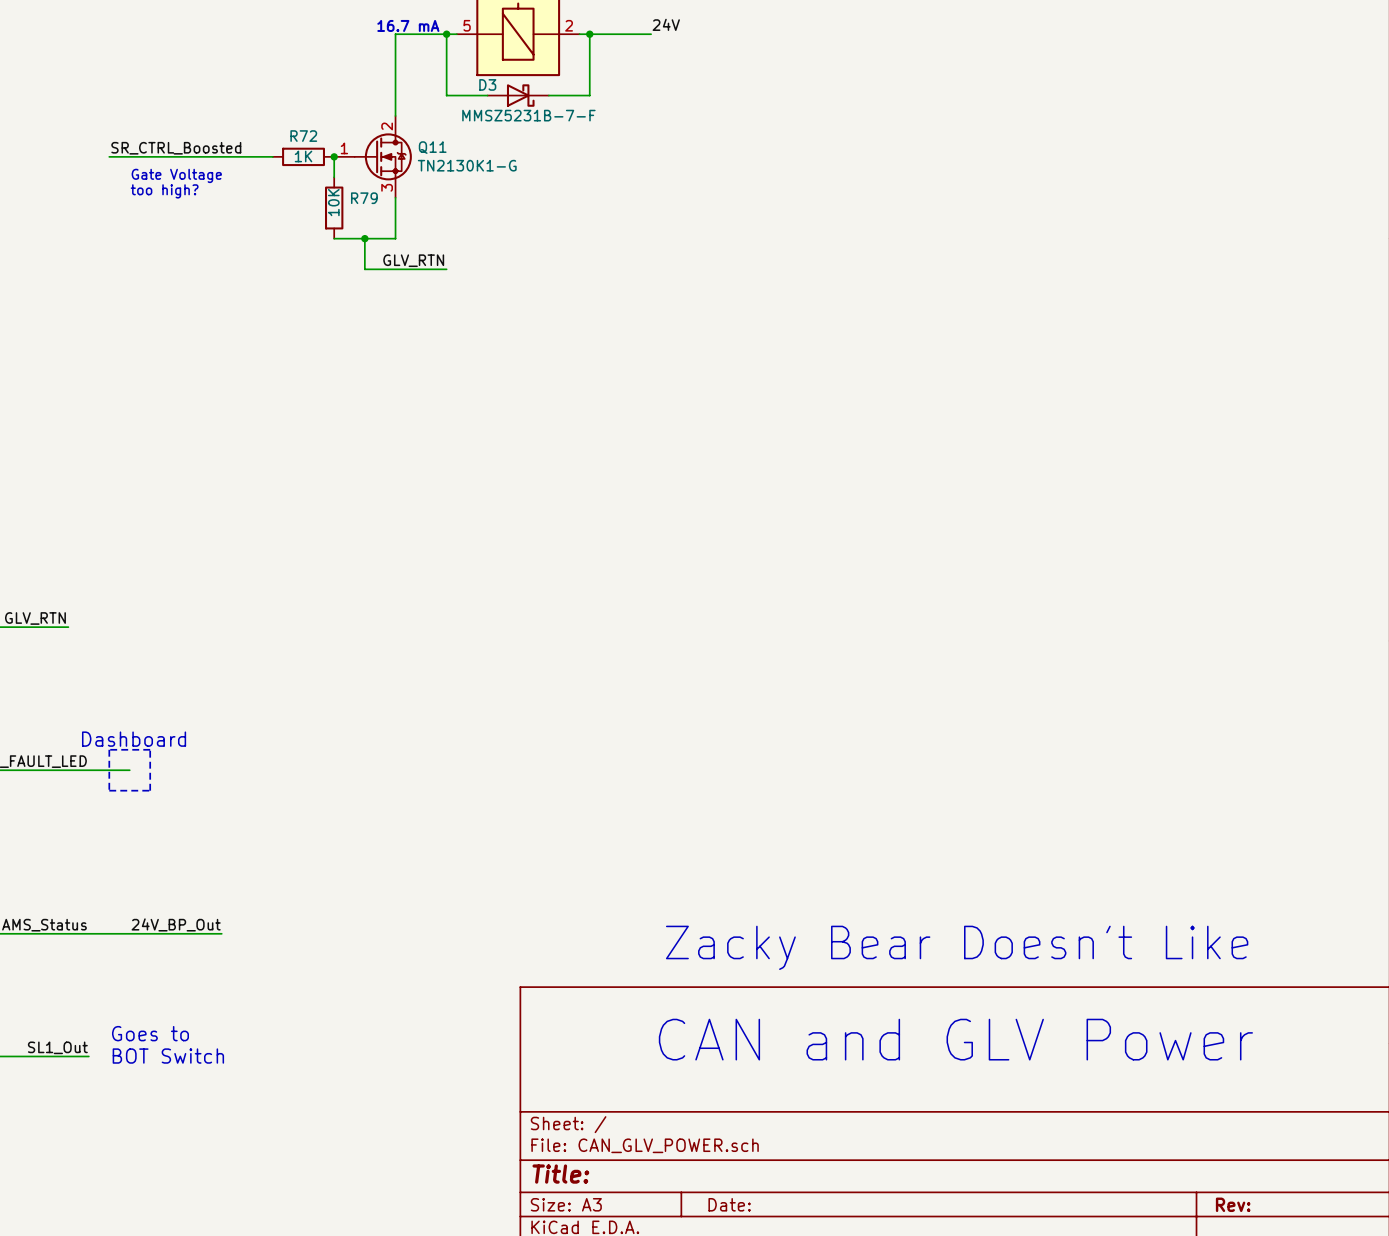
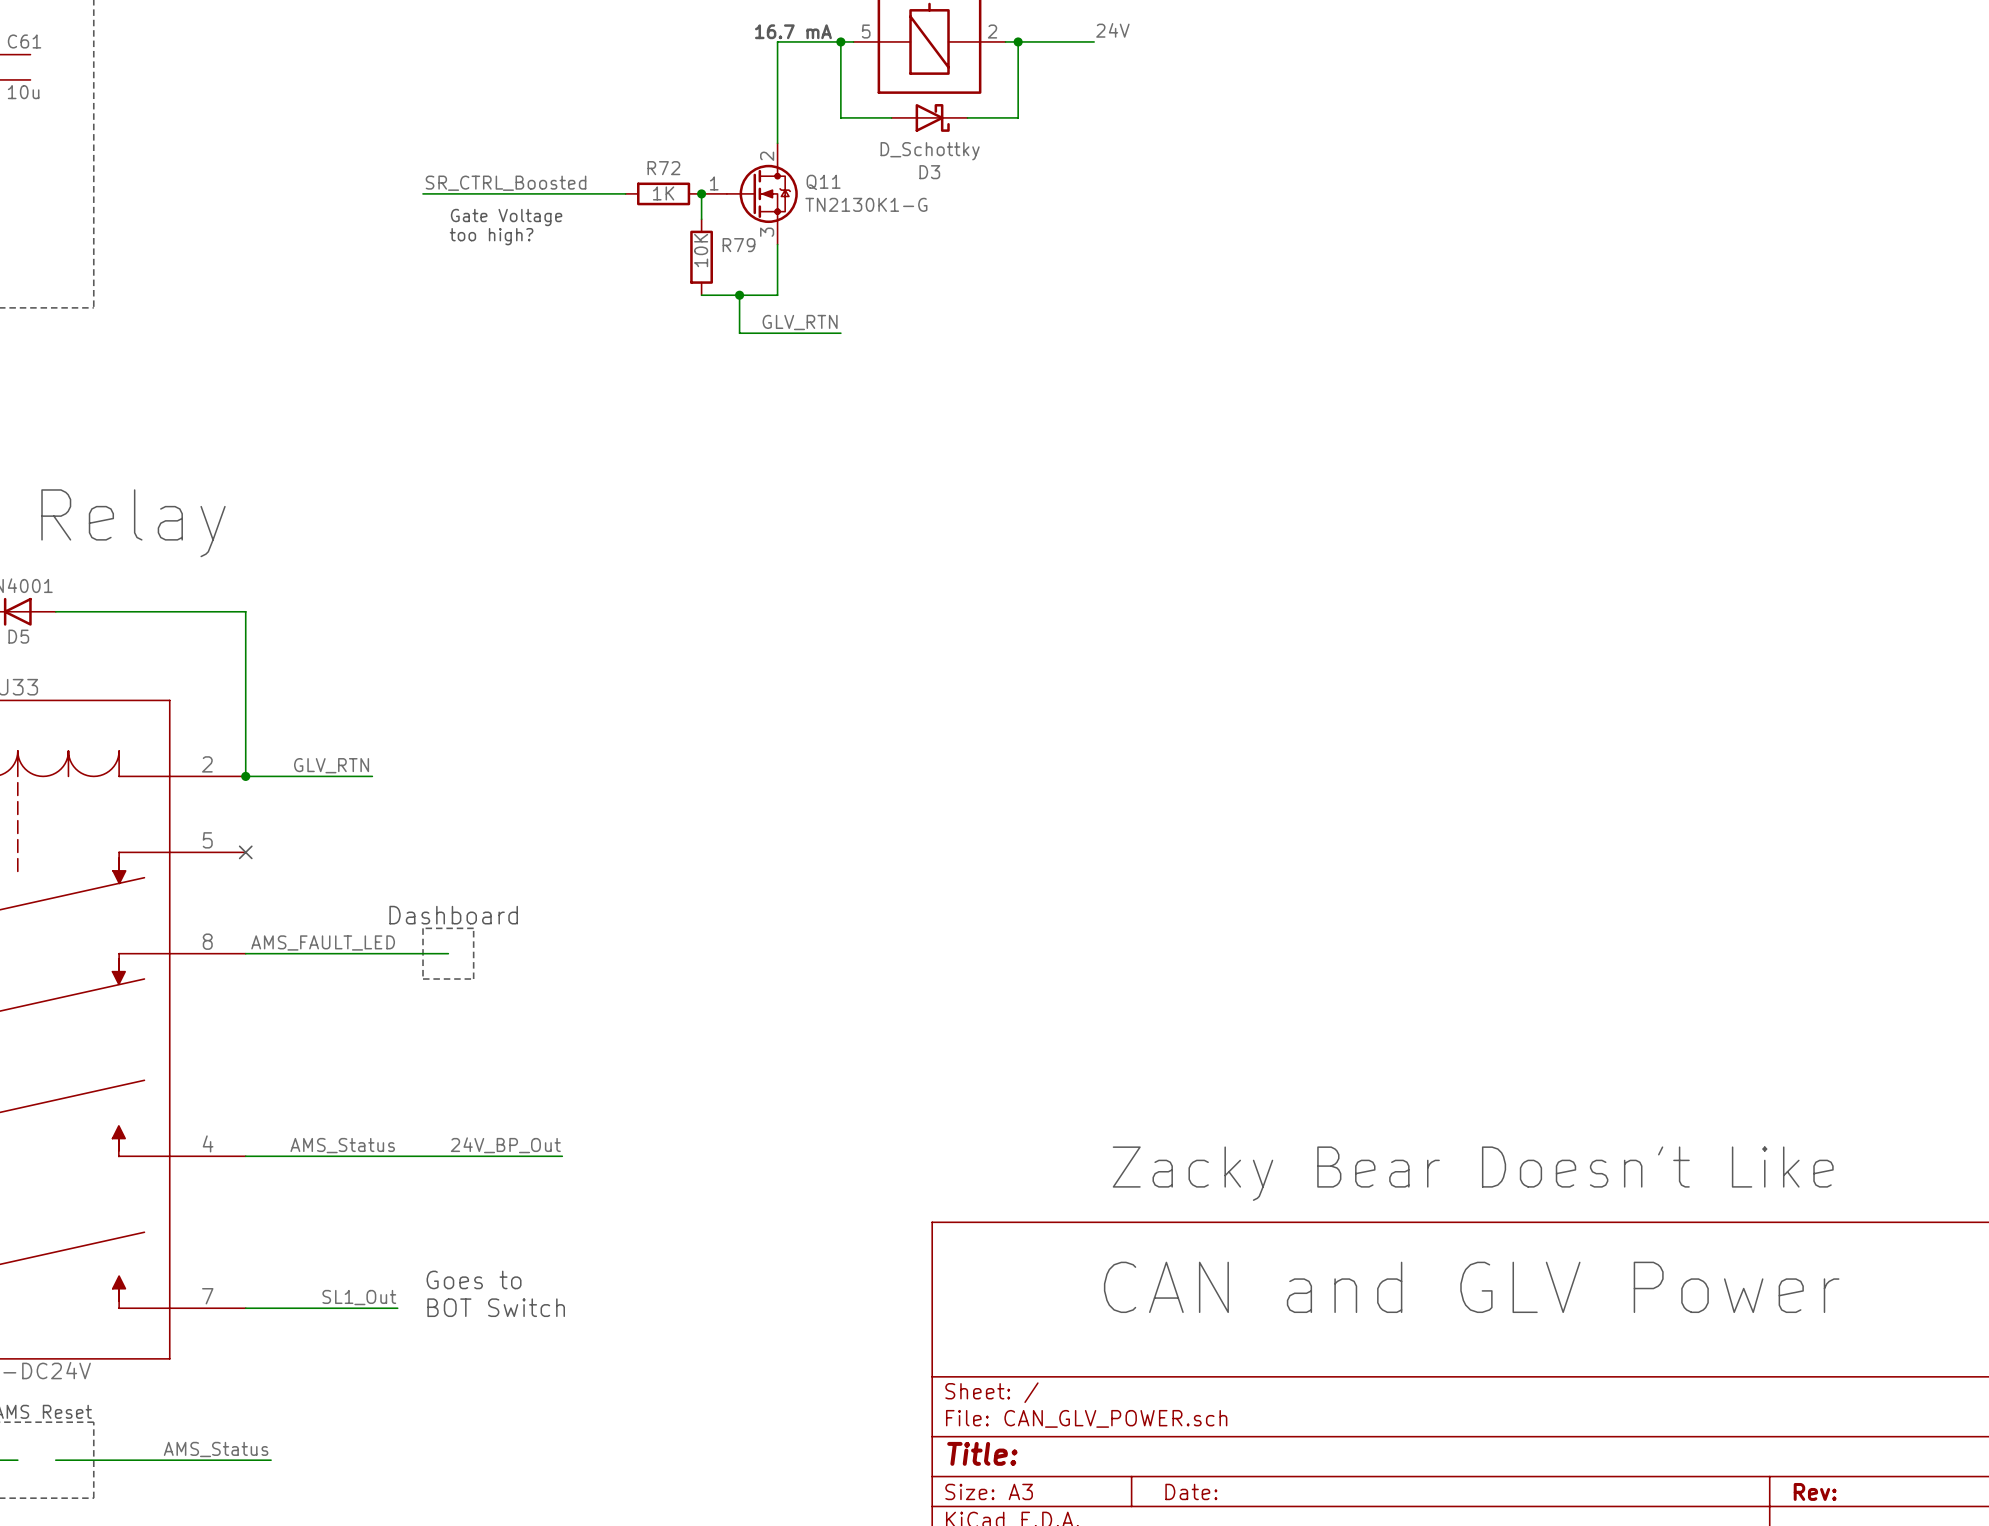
D3 name position: D3 (487, 84) -> D3 (929, 172)
D3 value: MMSZ5231B-7-F (528, 115) -> D_Schottky (930, 151)

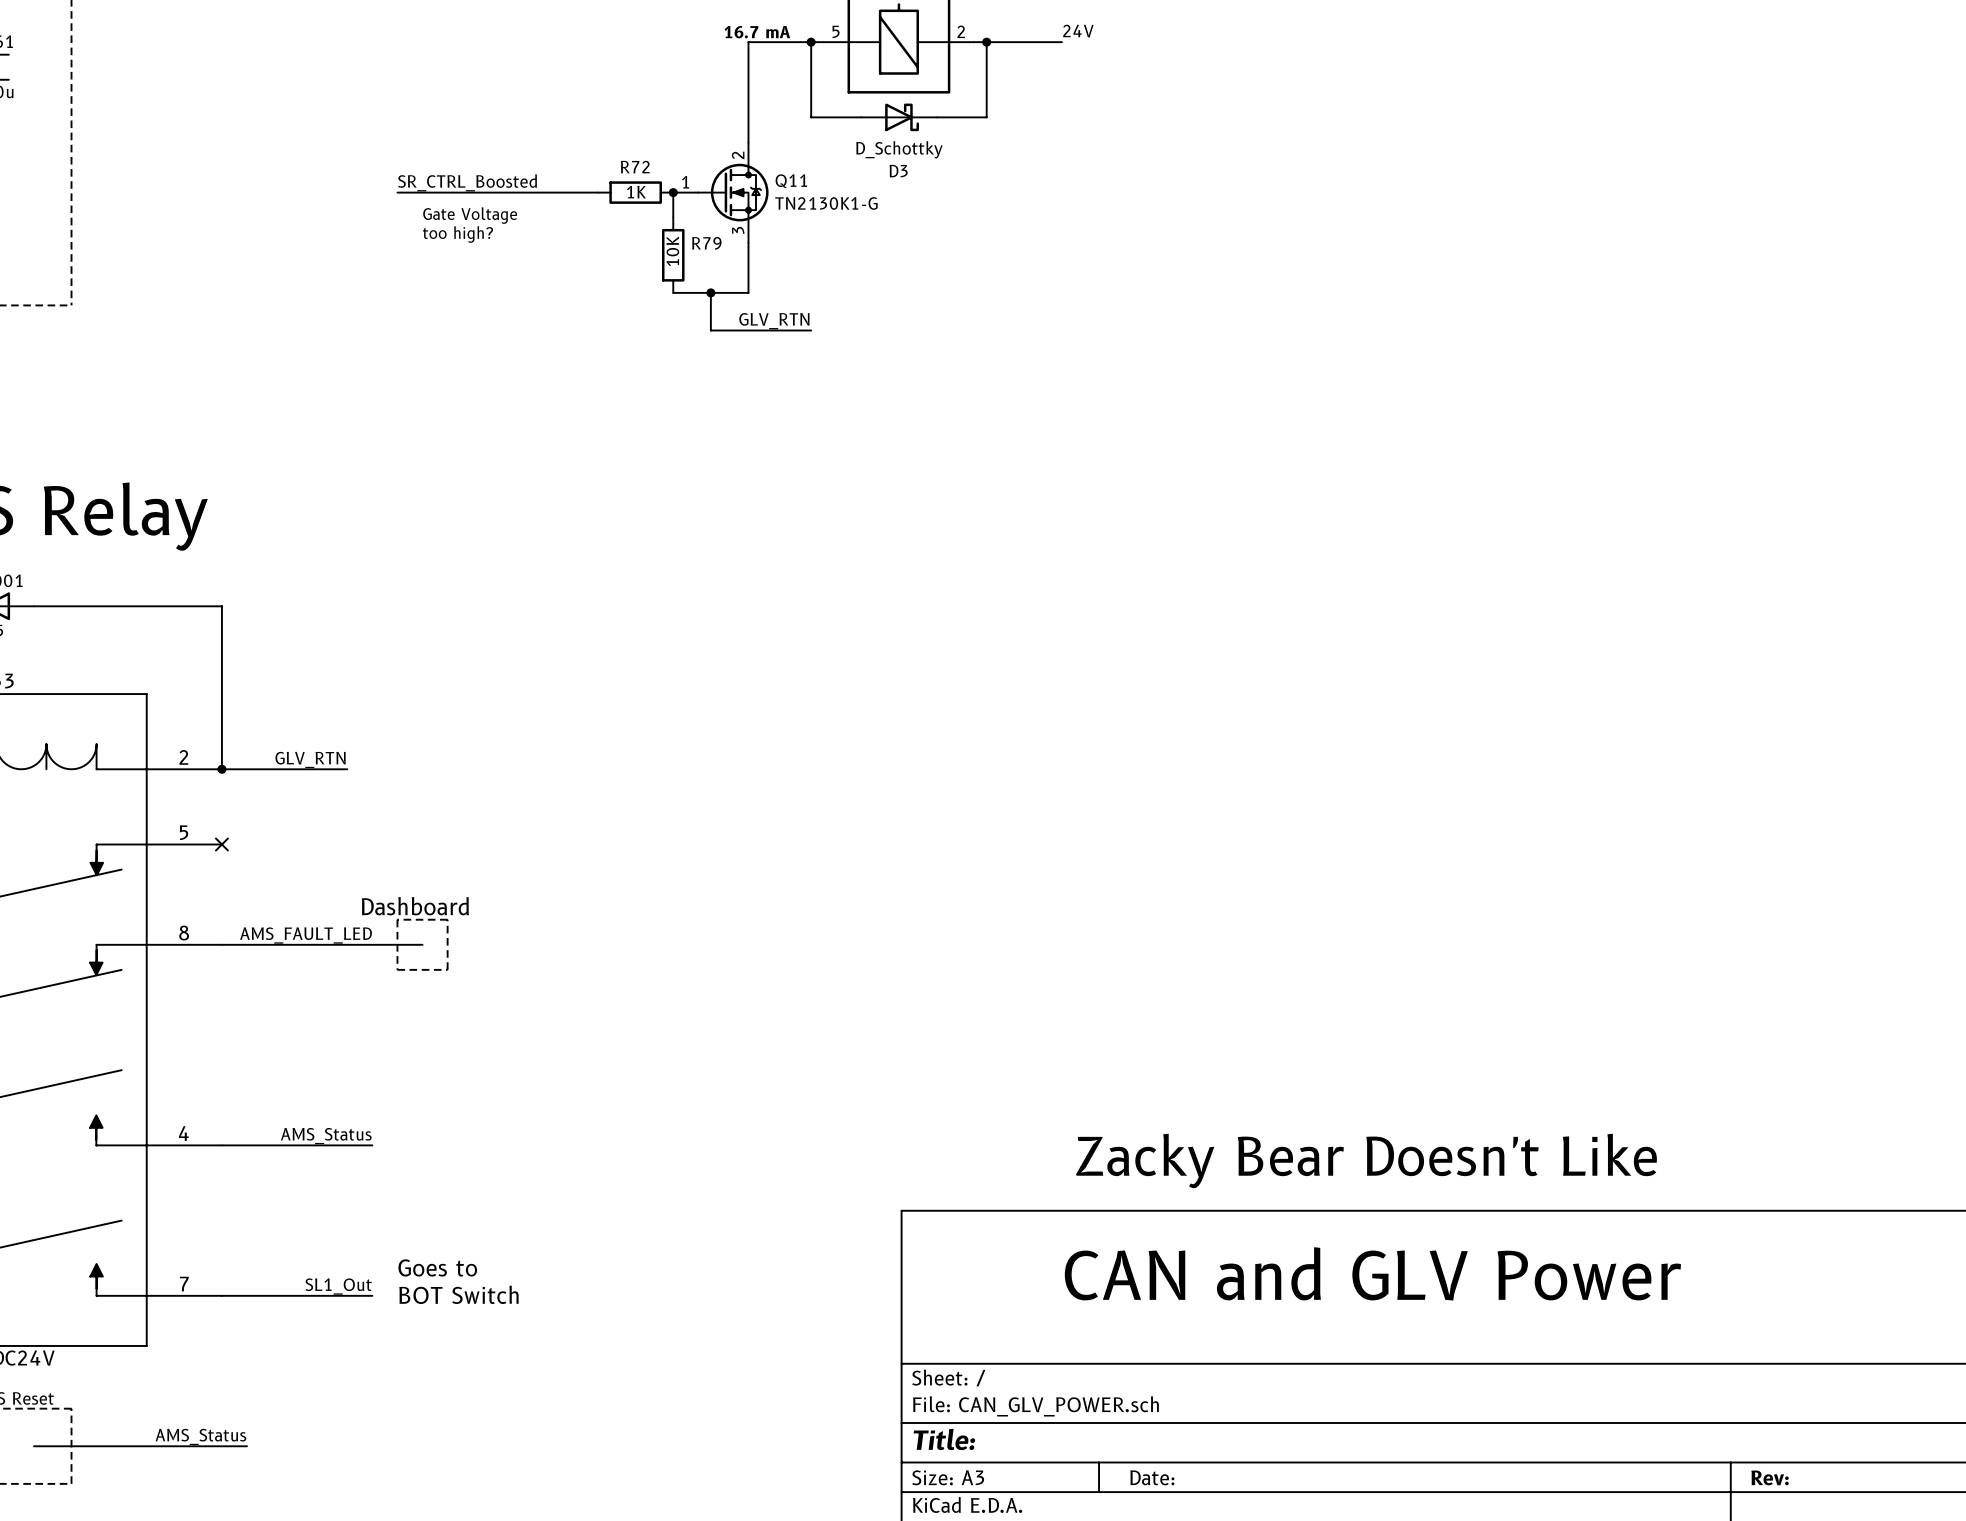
label: 24V_BP_Out (505, 1145) -> none
wire: (397, 1156) (562, 1156) -> none

